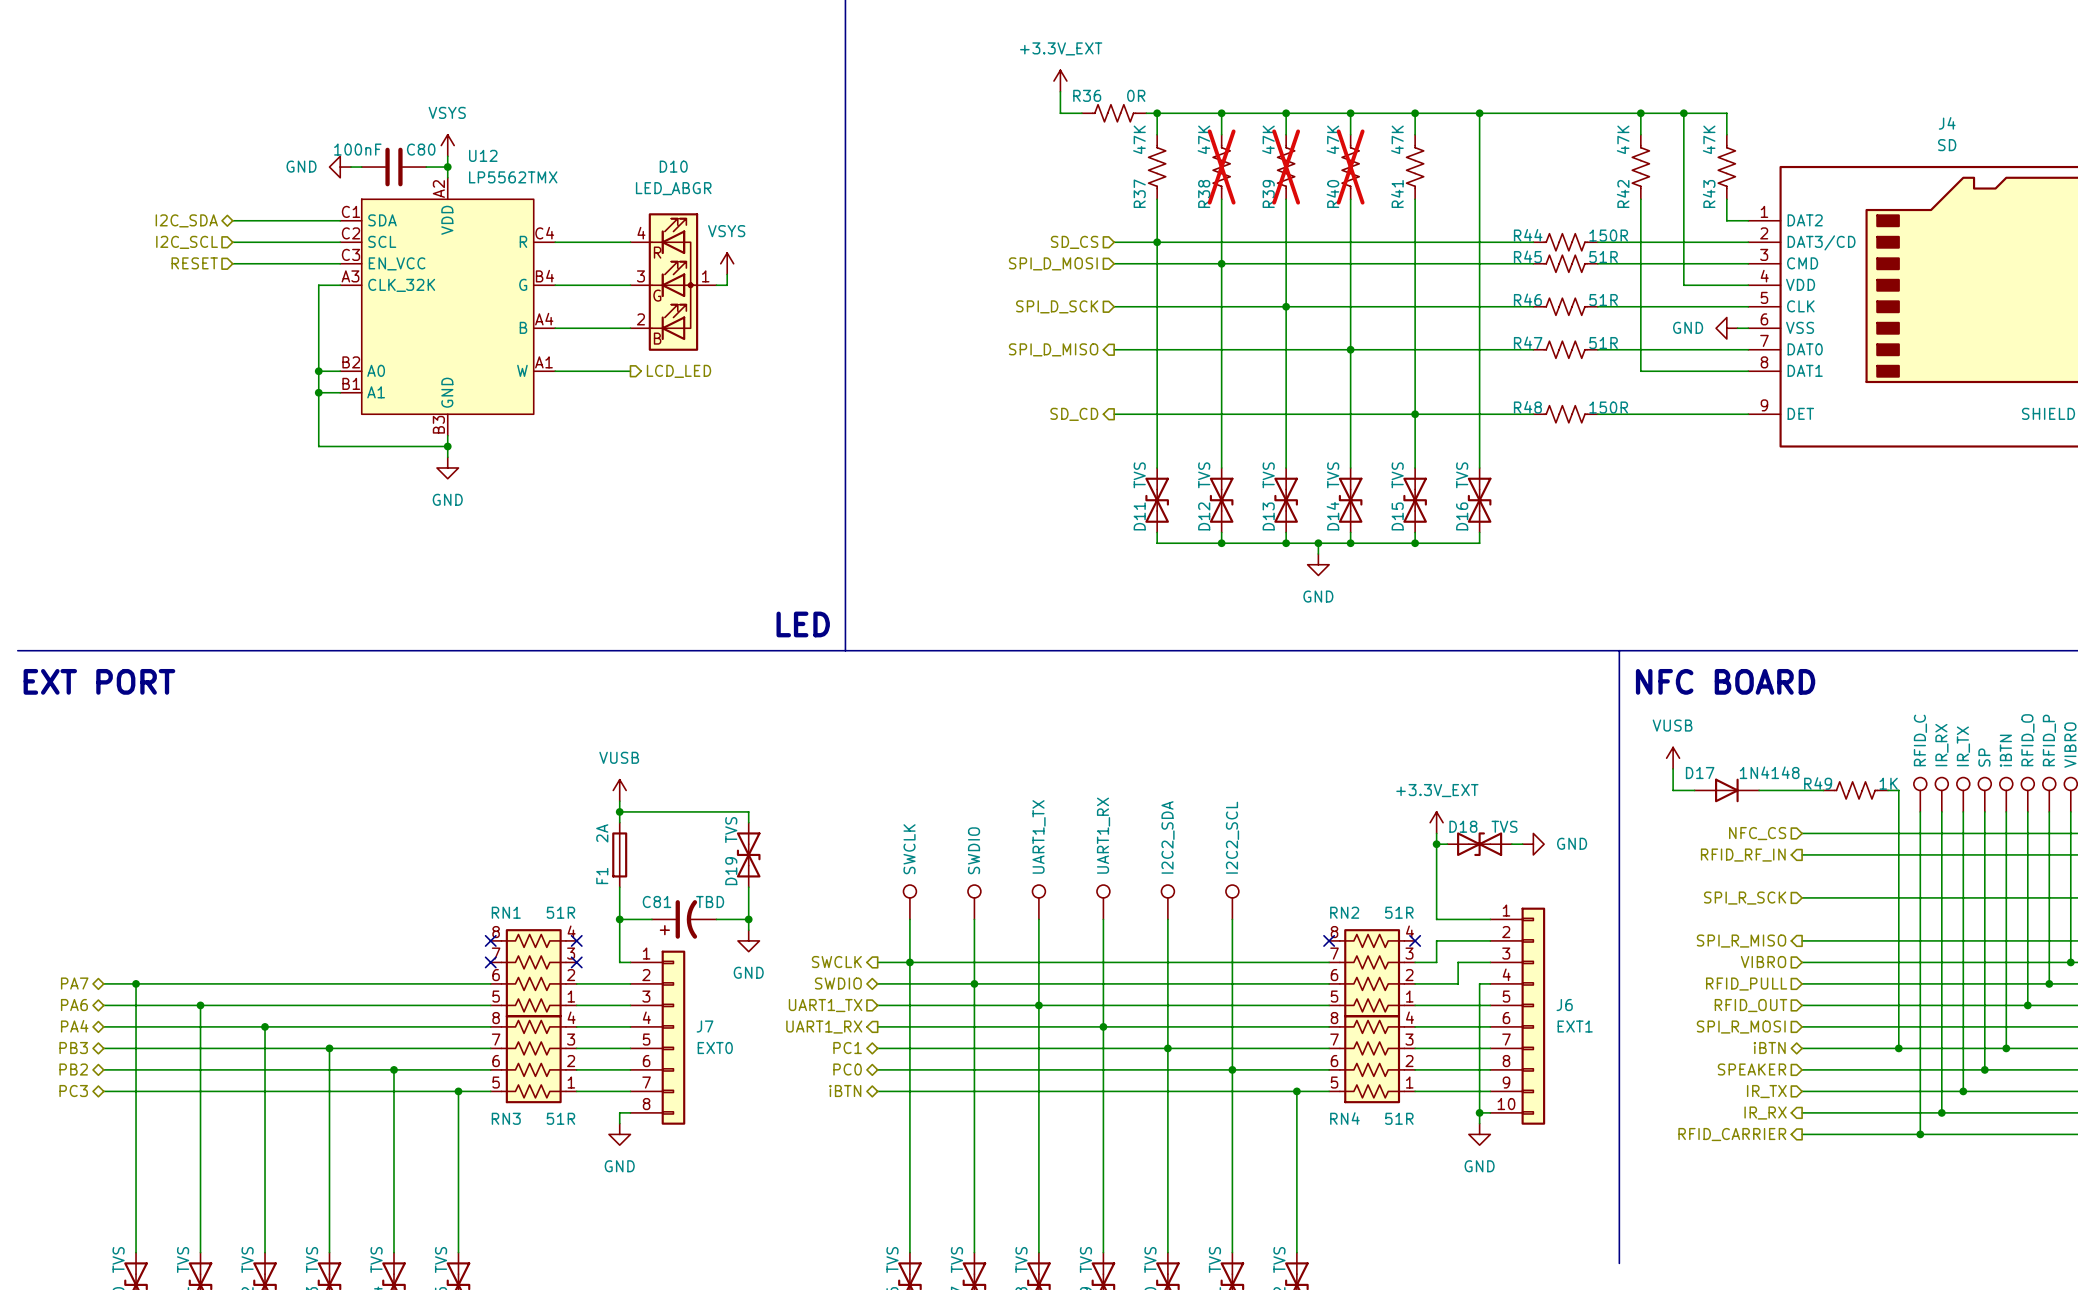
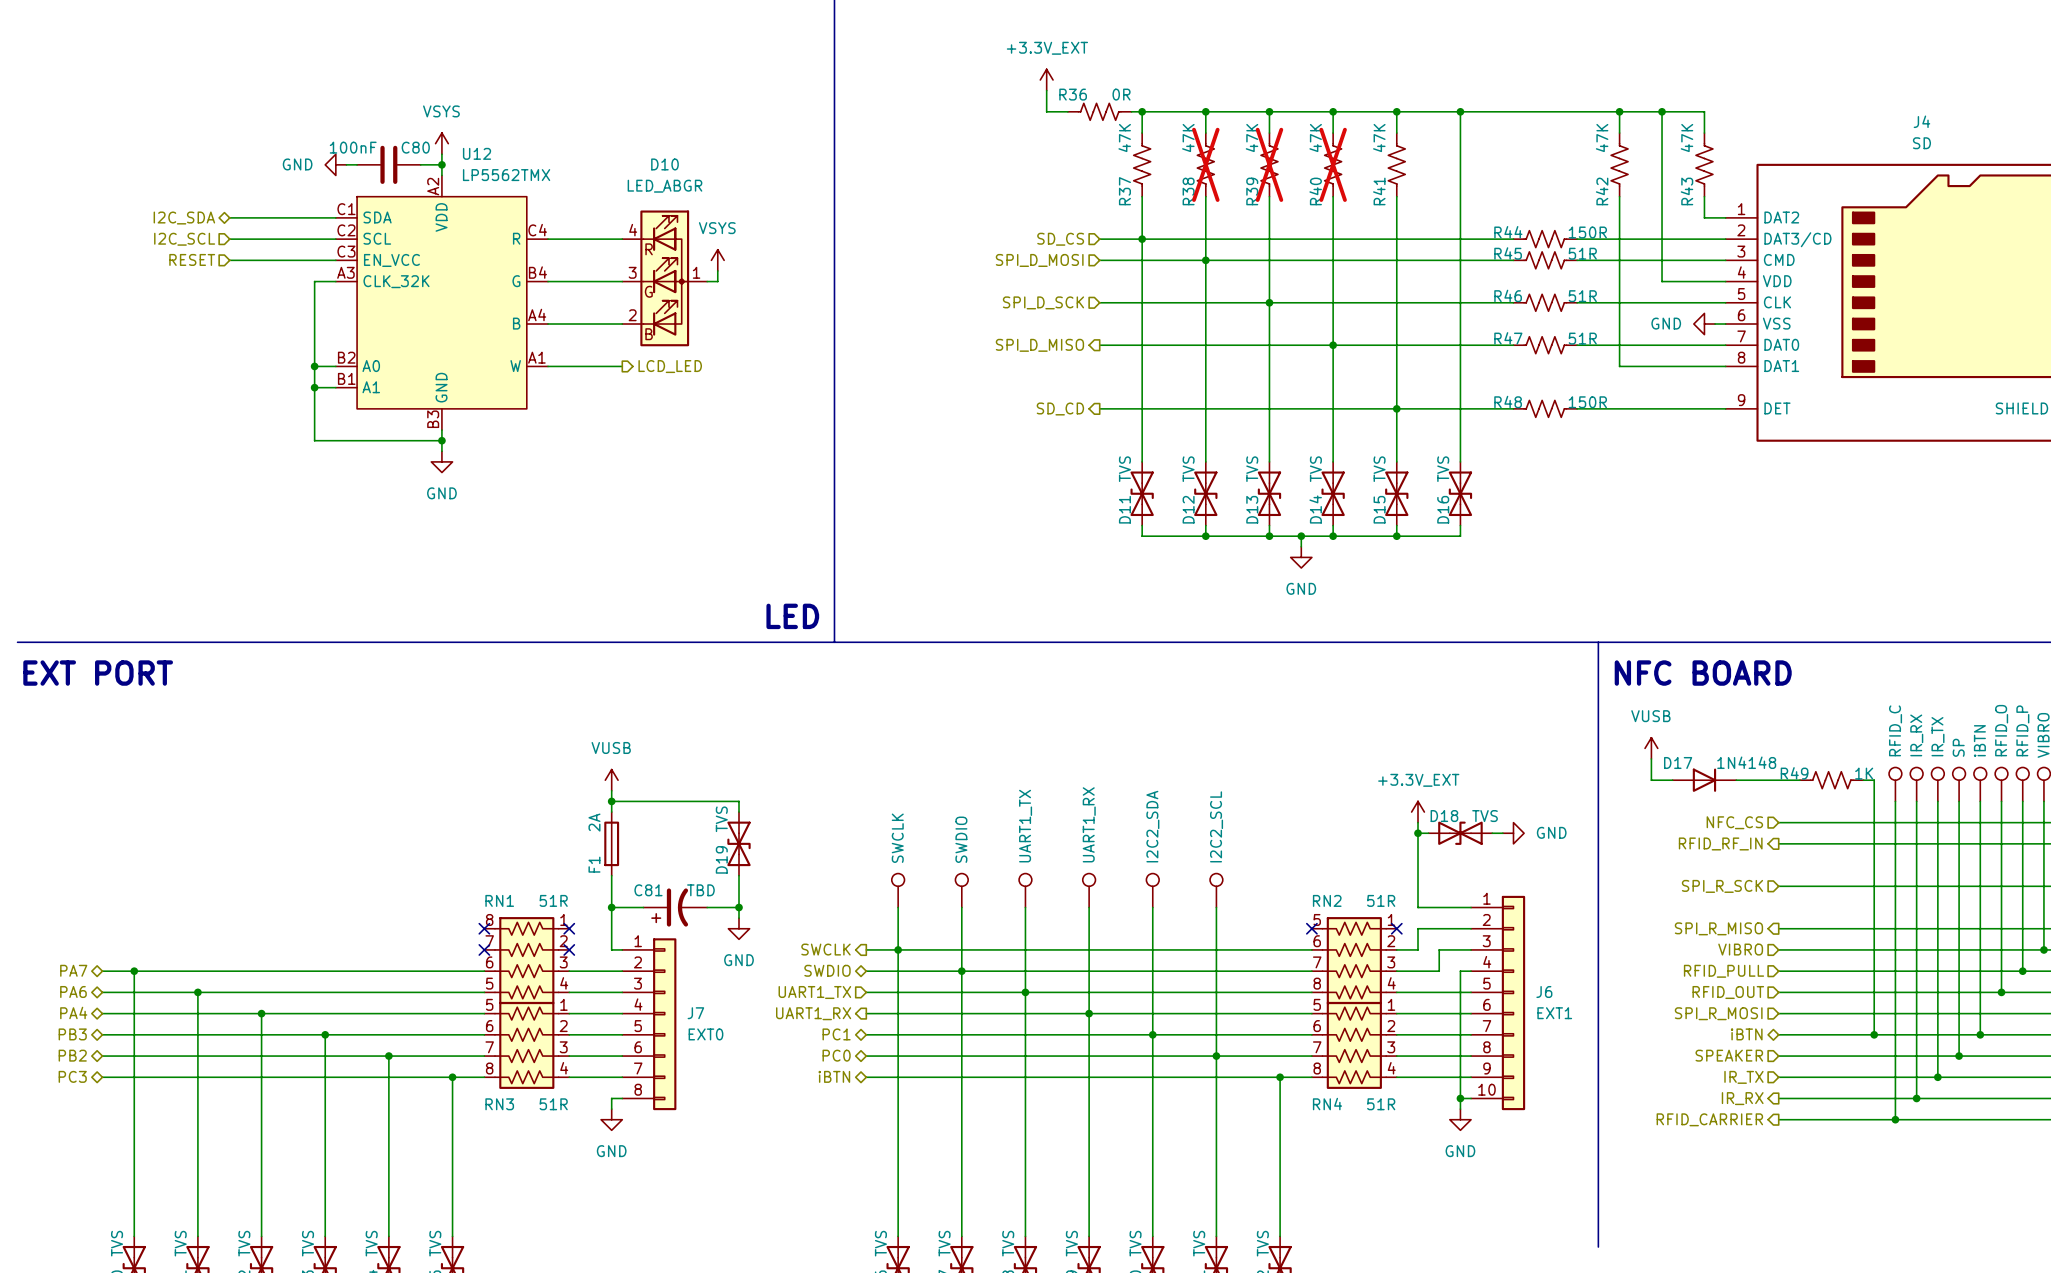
RN1 symbol: [490, 929, 577, 1018] -> [484, 917, 570, 1005]
RN2 flip: as is (1372, 973) -> up-down (1354, 960)
RN3 flip: as is (533, 1059) -> up-down (526, 1045)
RN4 flip: as is (1372, 1059) -> up-down (1354, 1045)

